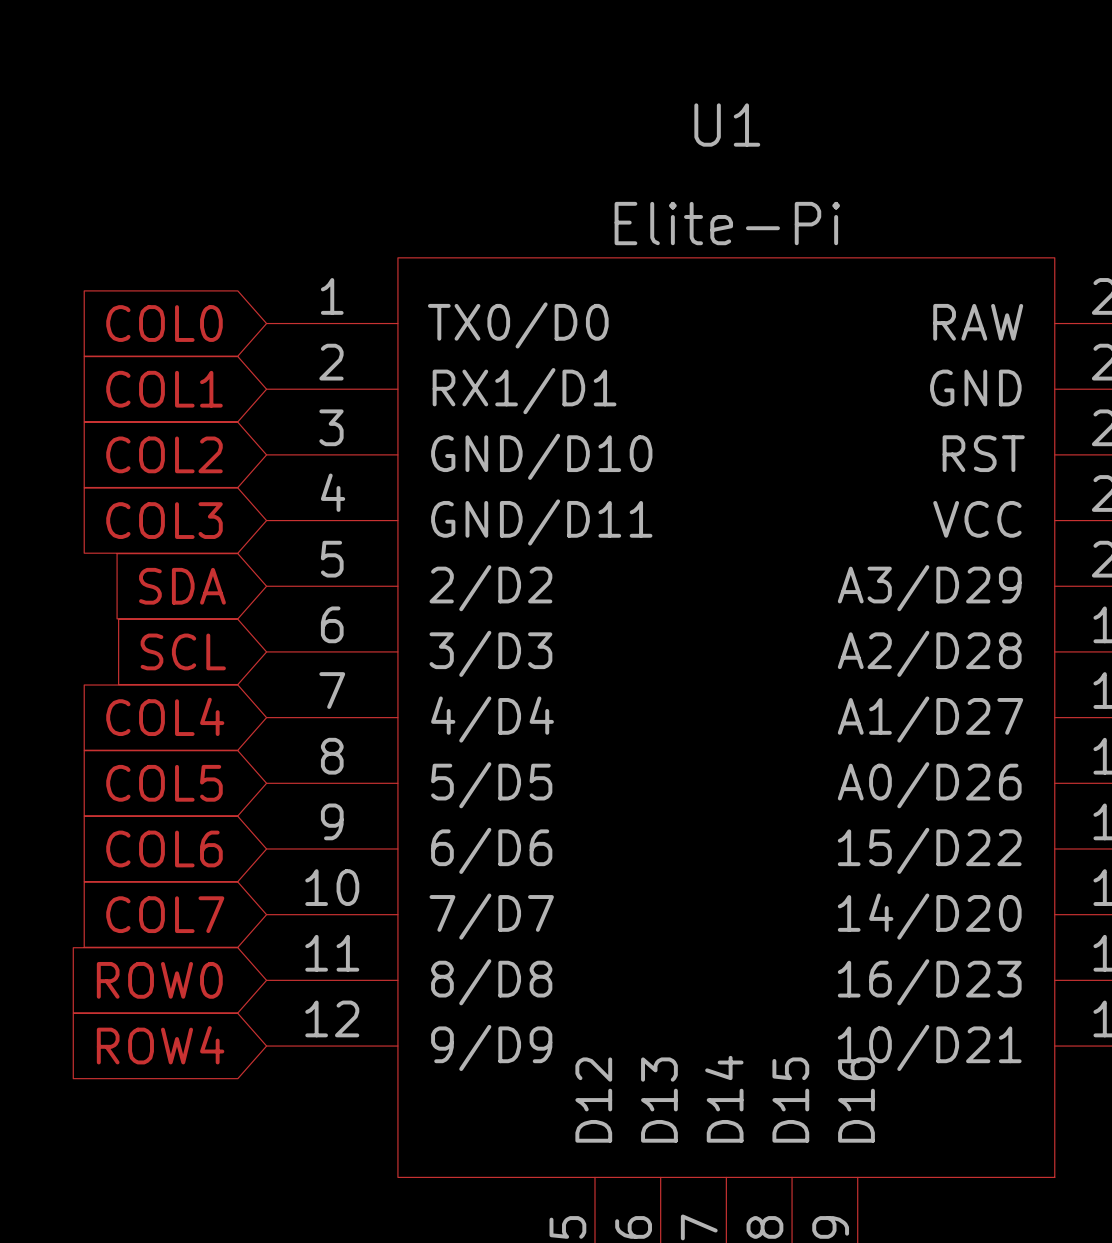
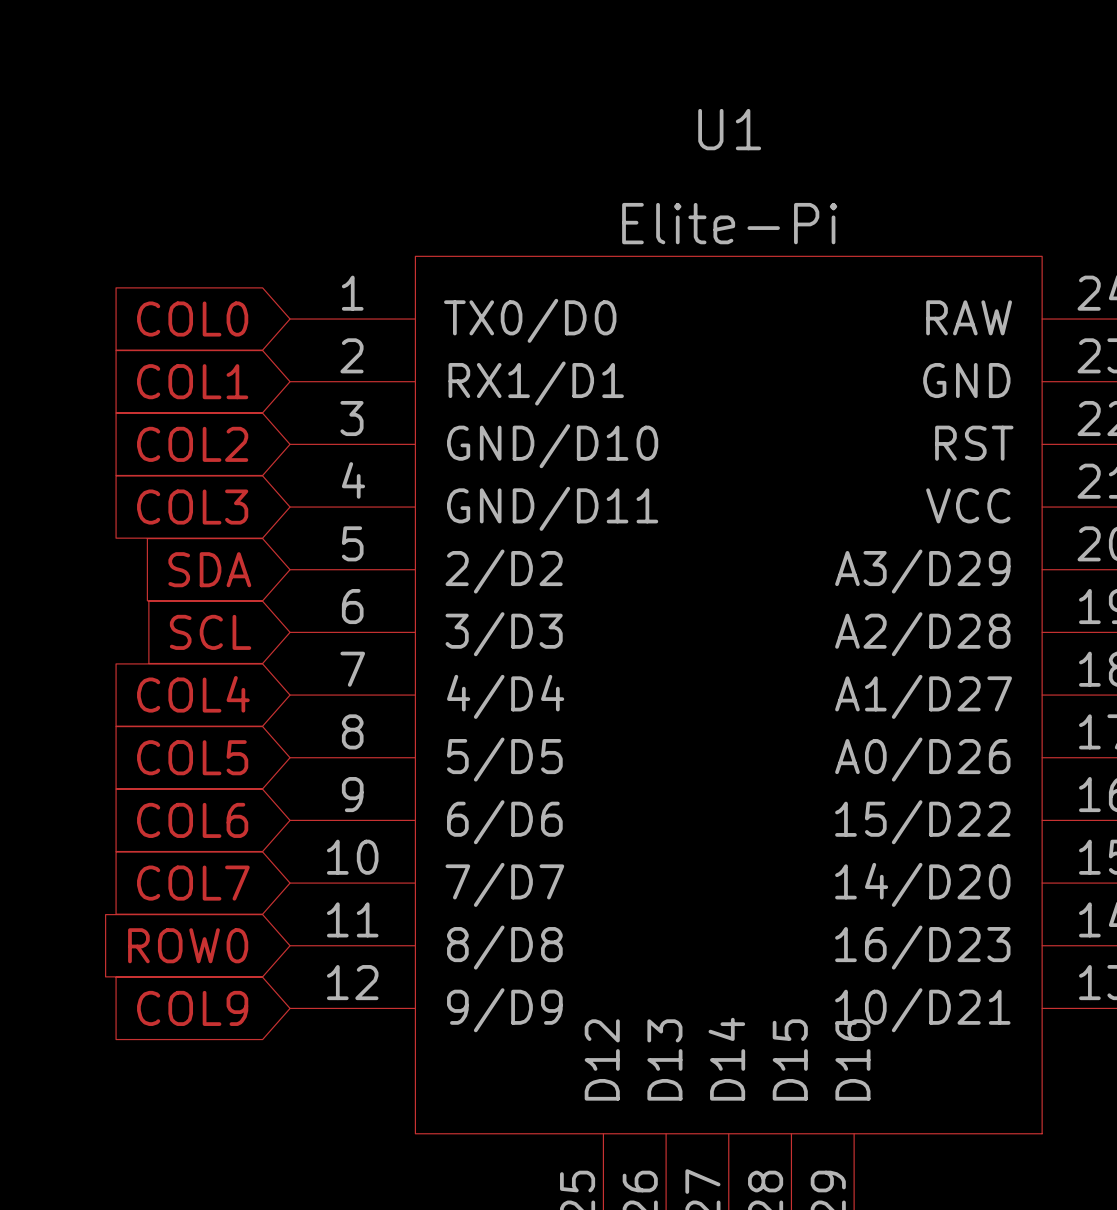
global label: ROW4 (160, 1045) -> COL9 (192, 1008)

